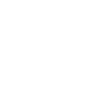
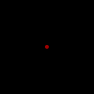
top track: none -> (46, 46) (46, 46)

